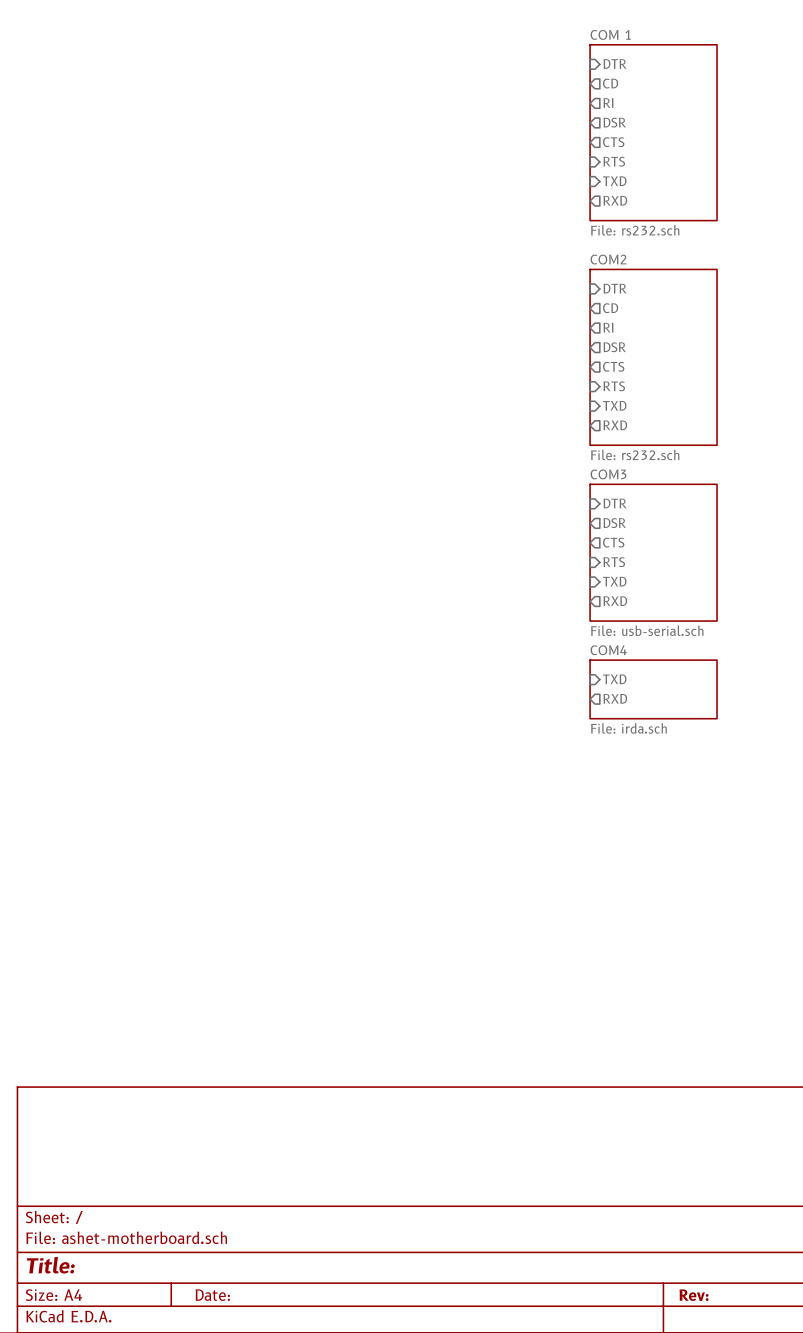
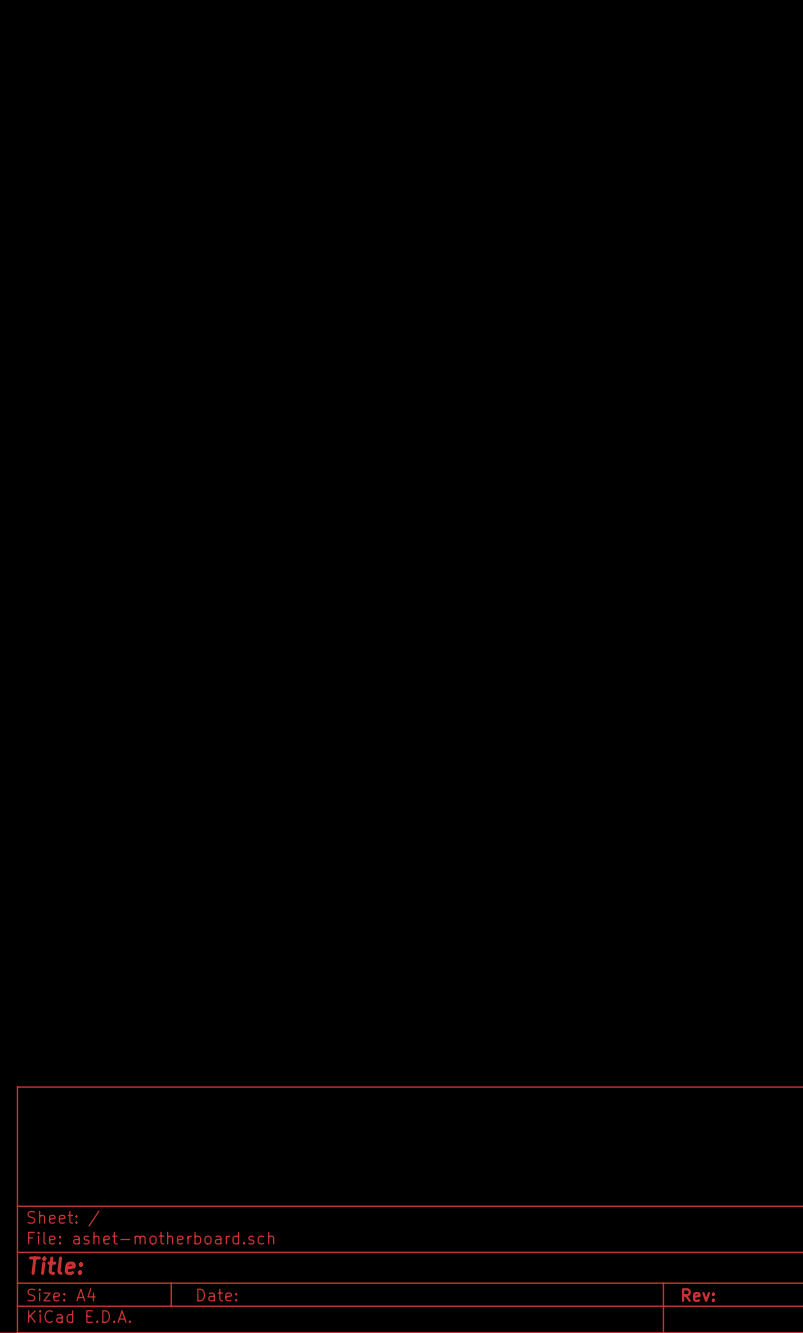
sheet pin: DTR (615, 63) -> none
sheet pin: CD (610, 83) -> none
sheet pin: RI (608, 103) -> none
sheet pin: DSR (614, 122) -> none
sheet COM 1: File: rs232.sch (653, 132) -> none
sheet pin: CTS (613, 142) -> none
sheet pin: RTS (614, 161) -> none
sheet pin: TXD (614, 181) -> none
sheet pin: RXD (615, 200) -> none
sheet pin: DTR (615, 288) -> none
sheet pin: CD (610, 308) -> none
sheet pin: RI (608, 327) -> none
sheet pin: DSR (614, 347) -> none
sheet COM2: File: rs232.sch (653, 357) -> none
sheet pin: CTS (613, 366) -> none
sheet pin: RTS (614, 386) -> none
sheet pin: TXD (614, 405) -> none
sheet pin: RXD (615, 425) -> none
sheet pin: DTR (615, 503) -> none
sheet pin: DSR (614, 523) -> none
sheet pin: CTS (613, 542) -> none
sheet COM3: File: usb-serial.sch (653, 552) -> none
sheet pin: RTS (614, 562) -> none
sheet pin: TXD (614, 581) -> none
sheet pin: RXD (615, 601) -> none
sheet pin: TXD (614, 679) -> none
sheet COM4: File: irda.sch (653, 689) -> none
sheet pin: RXD (615, 698) -> none

